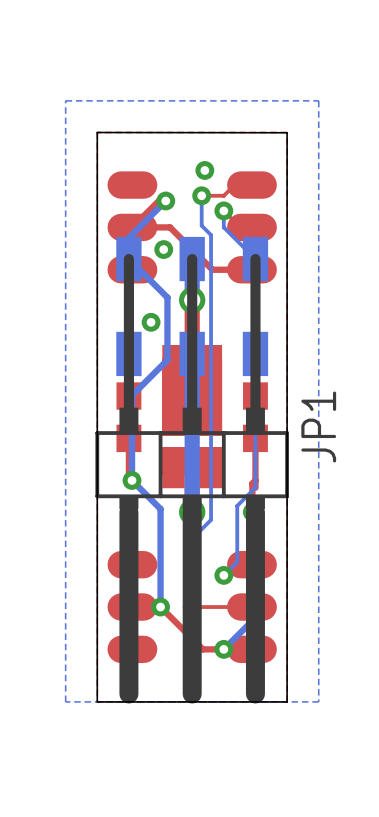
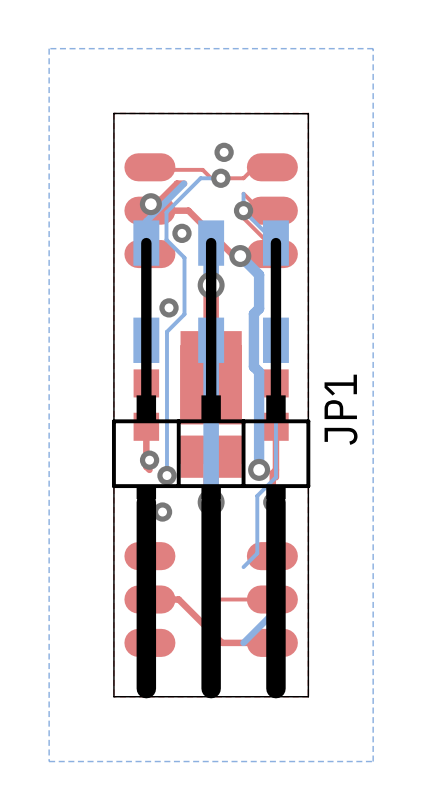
bottom zone outline: (318, 100) (65, 100) (65, 701) (318, 701) (318, 100) -> (373, 48) (373, 761) (49, 761) (49, 48) (373, 48)
top track: none -> (145, 169) (202, 169) (211, 178)
bottom track: none -> (211, 178) (200, 178) (166, 212) (166, 239) (184, 257) (184, 314) (166, 331) (166, 475)
bottom track: (201, 195) (201, 225) (211, 235) (211, 519) (192, 538) (192, 607) -> none
via: (165, 200) -> none
via position: (223, 210) -> (243, 210)
via: none -> (150, 204)
top track: none -> (243, 210) (243, 218) (276, 251)
bottom track: (132, 255) (128, 259) (167, 297) (167, 360) (132, 395) (132, 480) (160, 509) (160, 607) -> none
bottom track: none -> (240, 256) (259, 274) (259, 308) (253, 313) (253, 366) (259, 371) (259, 469)
via: none -> (240, 256)
via: none -> (149, 460)
via: (132, 480) -> none
via: none -> (259, 469)
via: none -> (166, 475)
via: none -> (162, 512)
via: (223, 575) -> none
via: (160, 607) -> none
via: (223, 649) -> none

